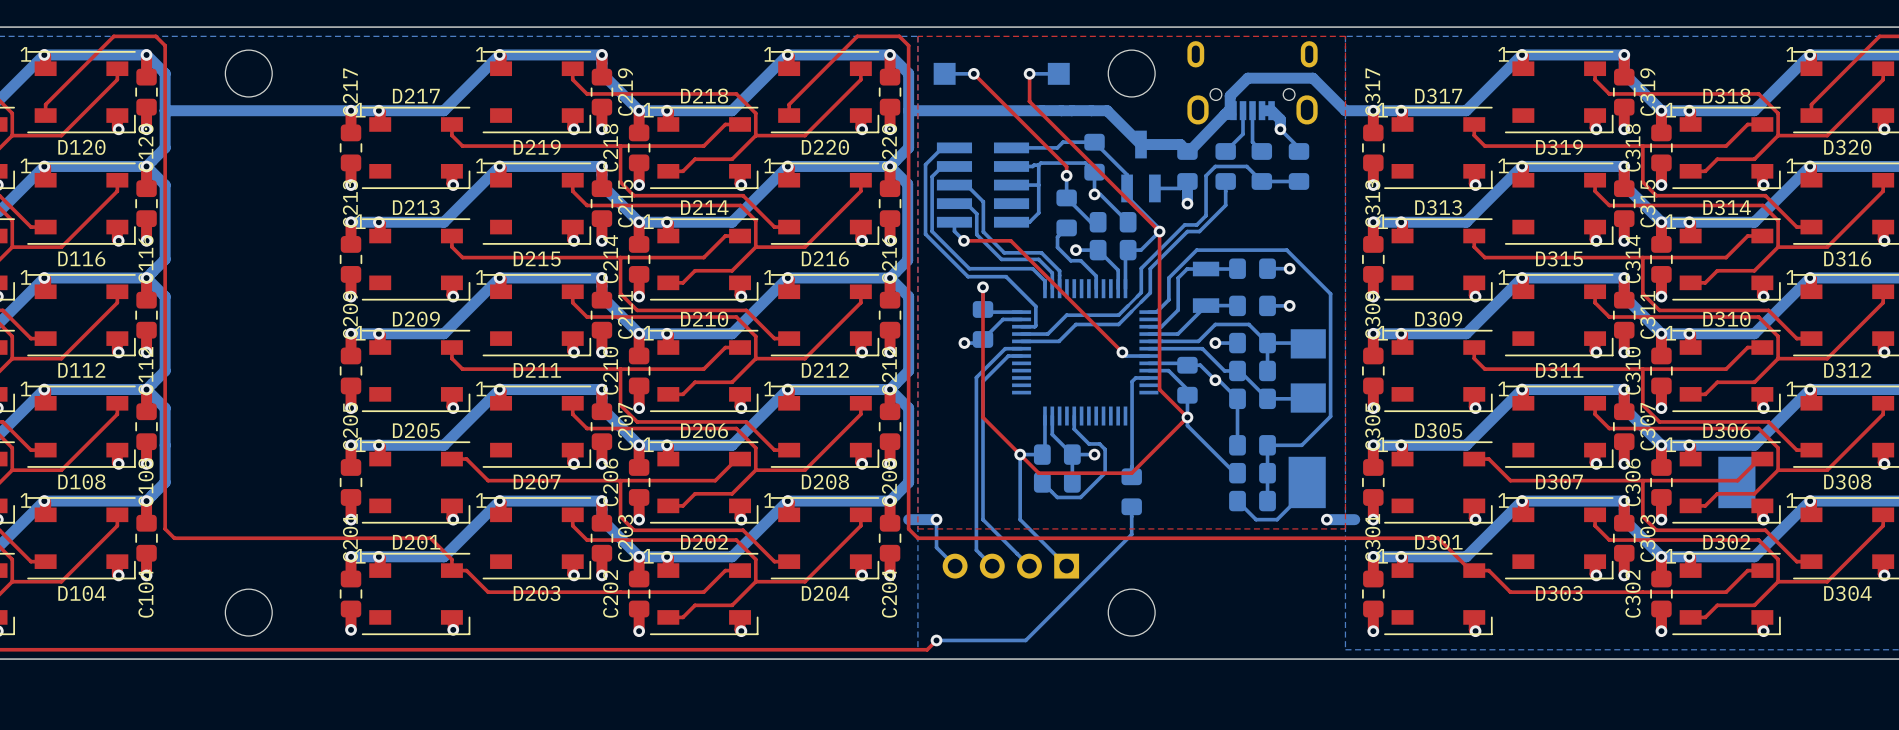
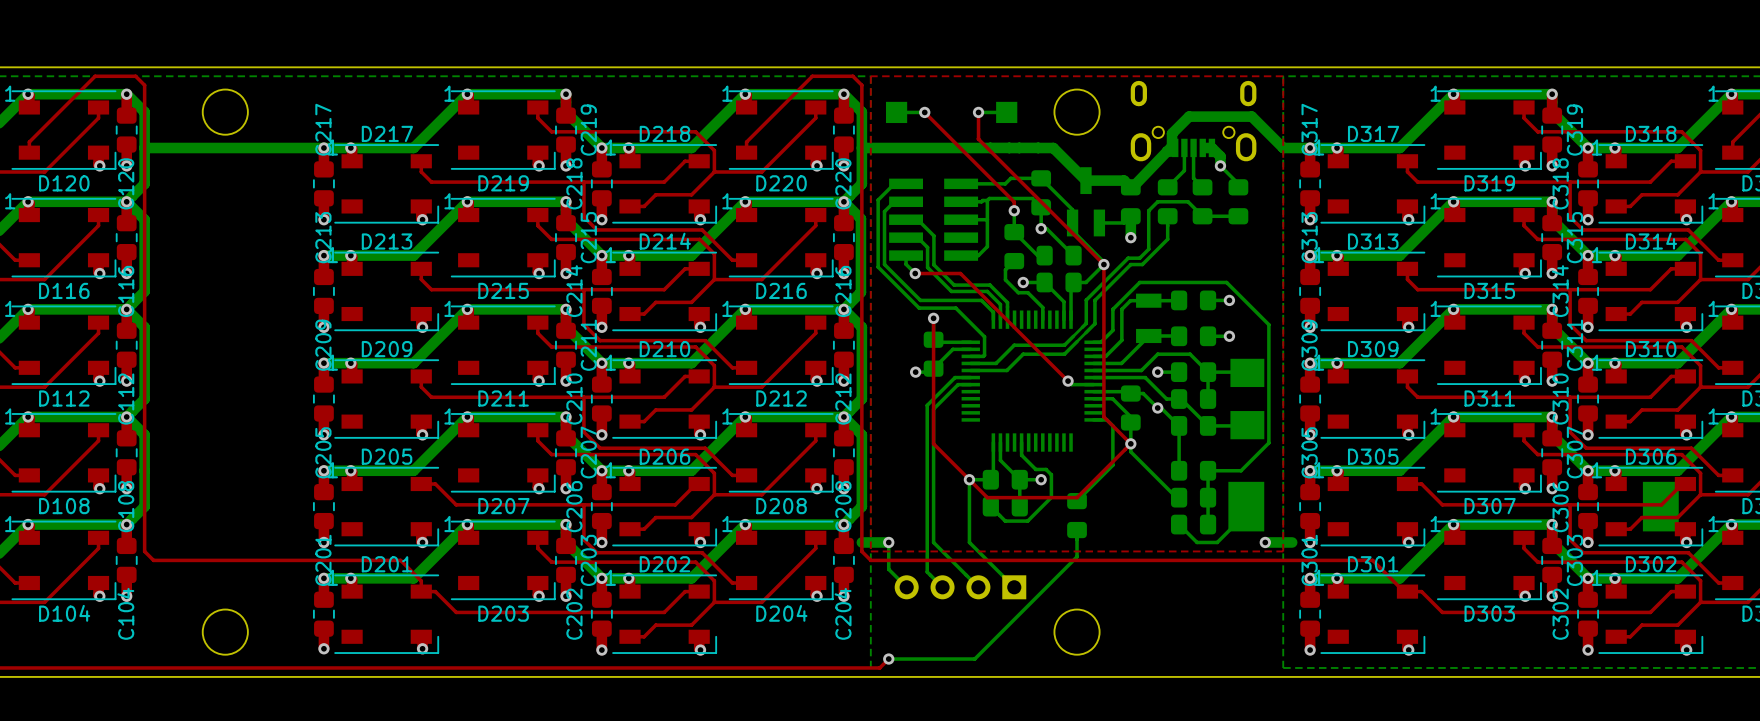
bottom track: (1148, 377) (1135, 377) (1132, 381) (1131, 476) -> (1093, 419) (1106, 419) (1112, 425) (1112, 465) (1077, 501)

